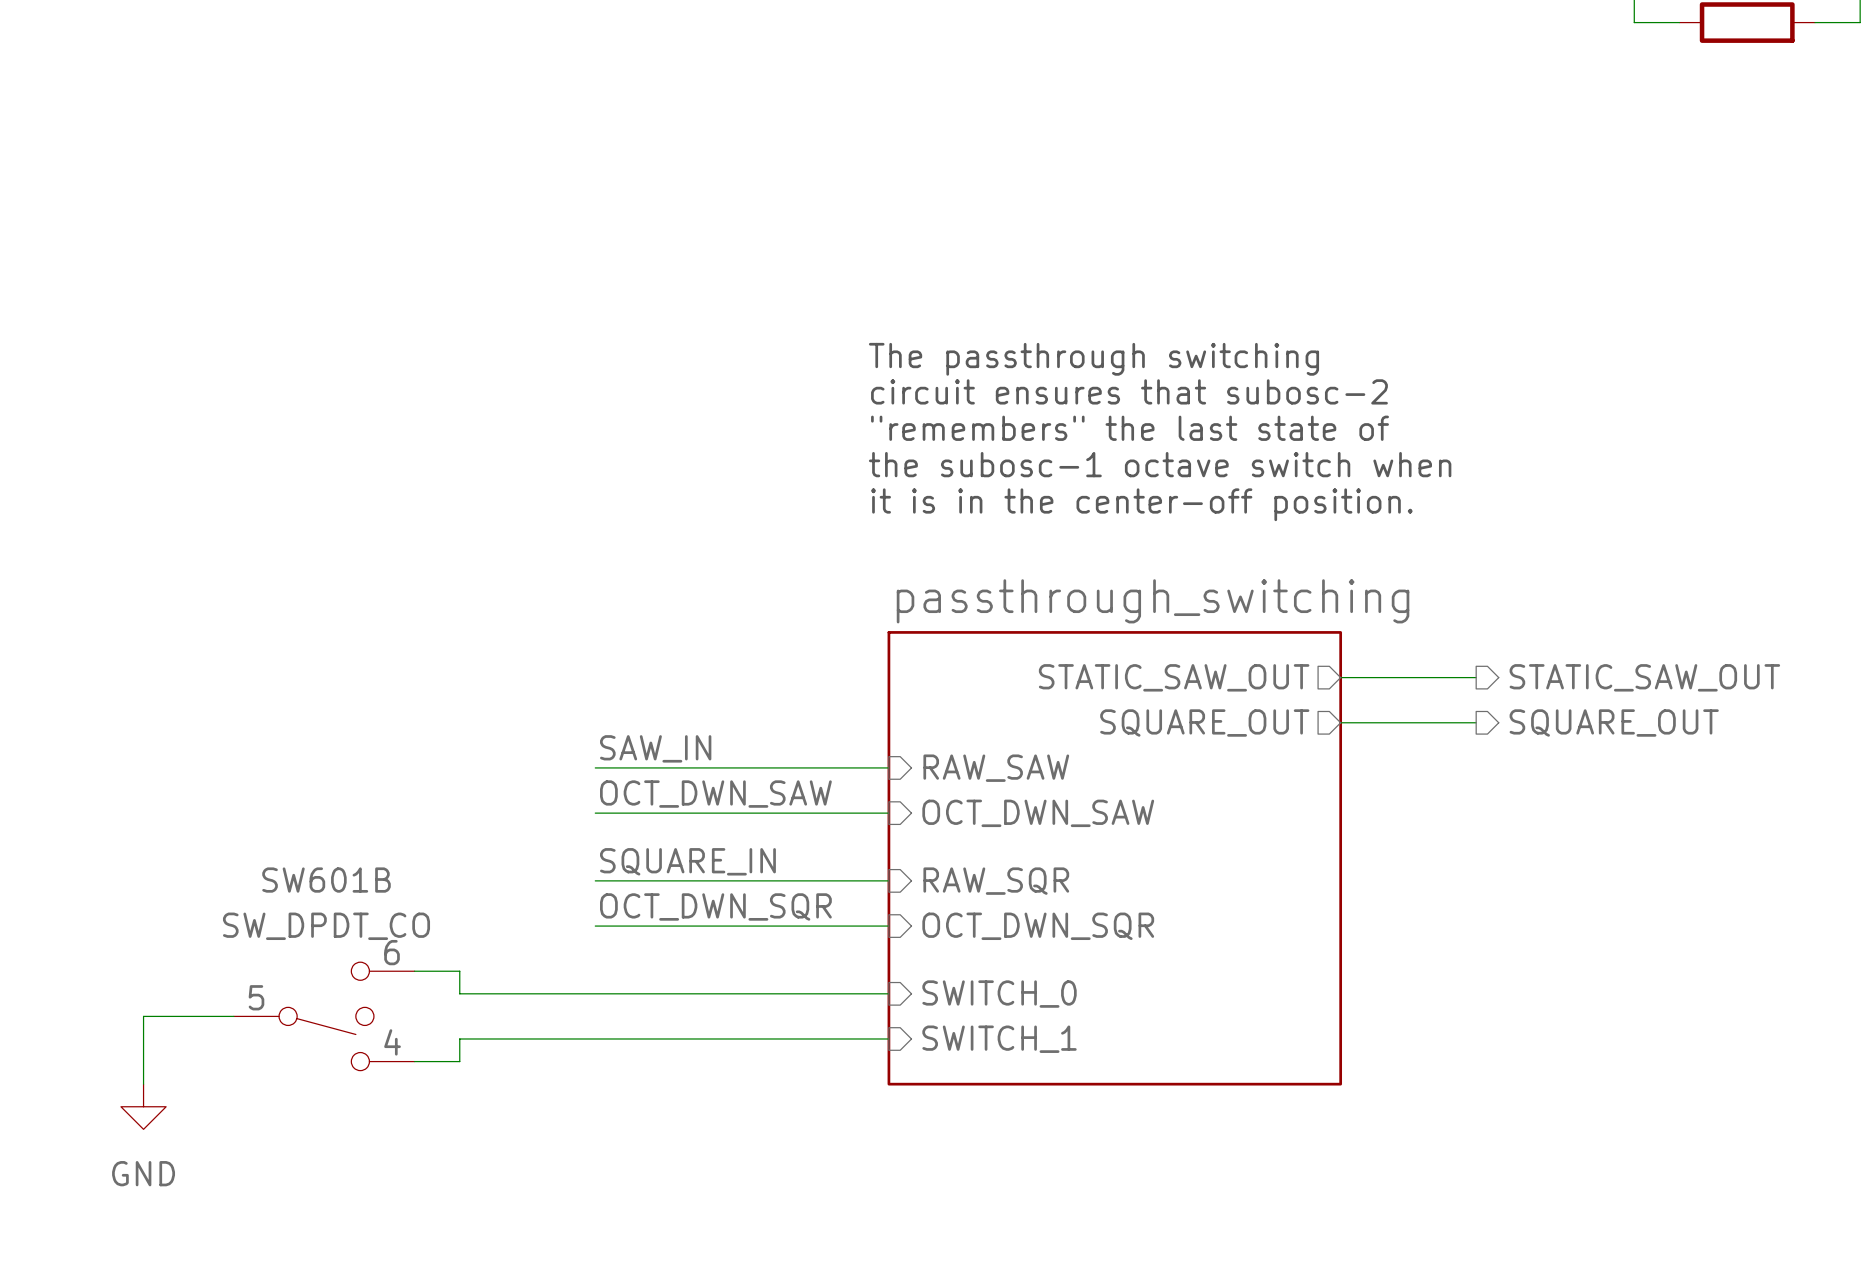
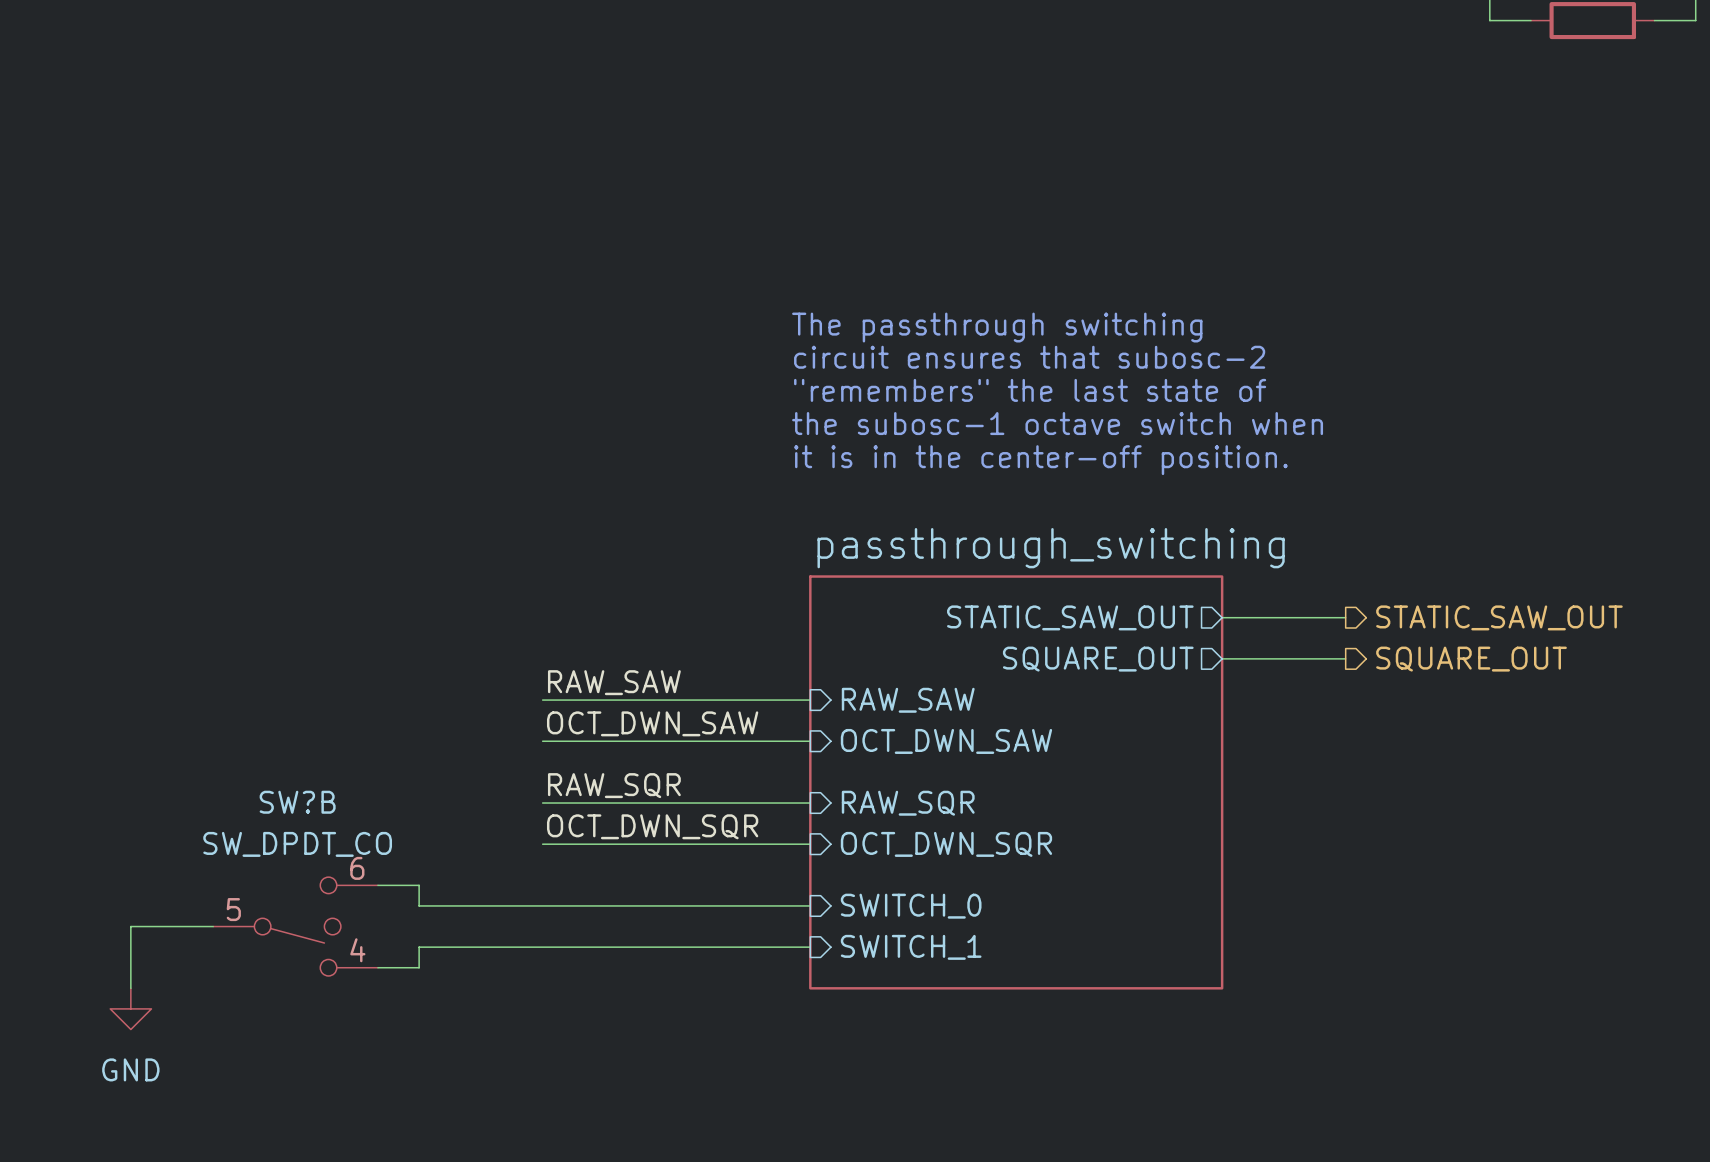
label: SAW_IN (655, 748) -> RAW_SAW (614, 682)
label: SQUARE_IN (687, 861) -> RAW_SQR (614, 785)
SW601B name: SW601B (326, 880) -> SW?B (297, 802)

